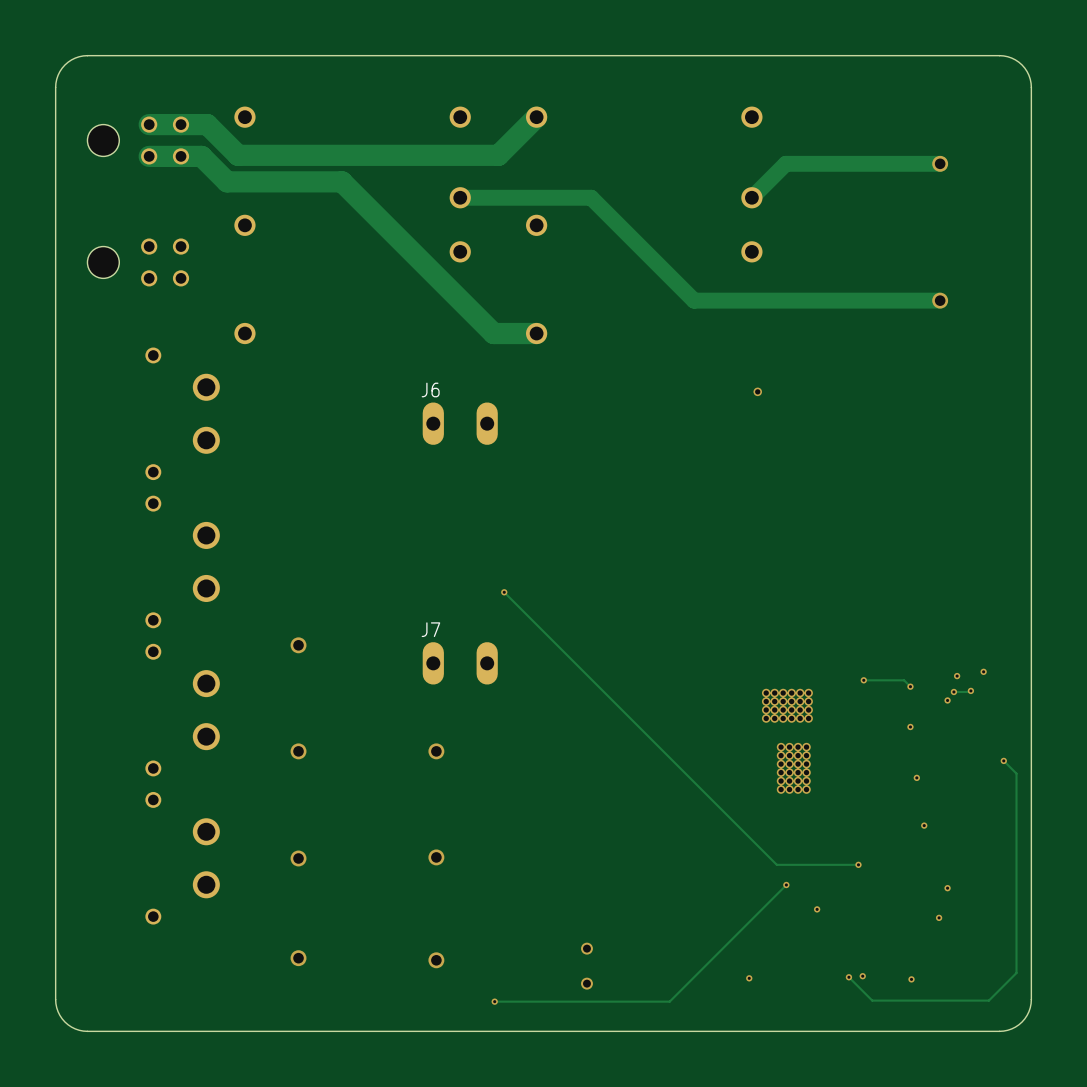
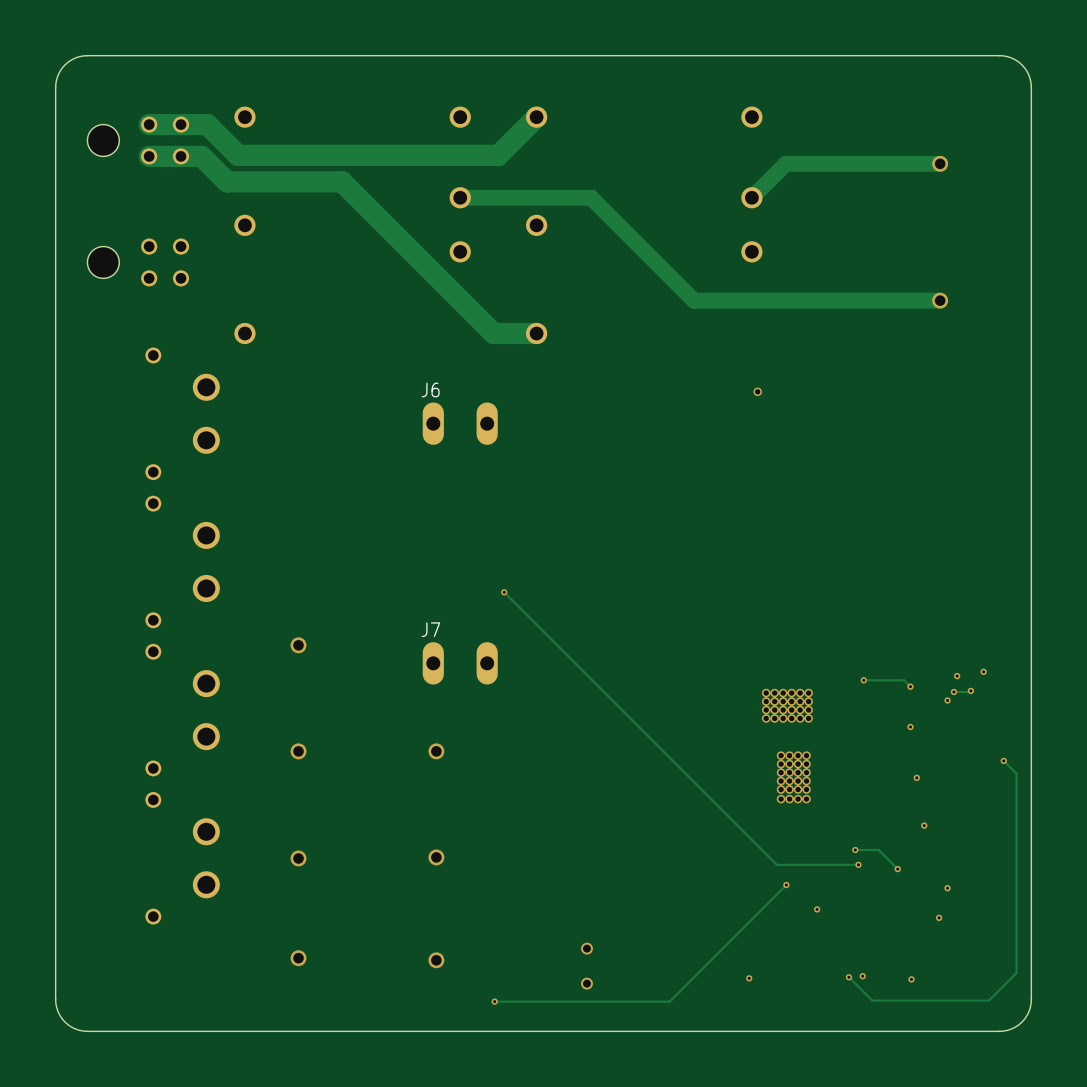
via: (781, 747) -> none
via: (789, 747) -> none
via: (798, 747) -> none
via: (806, 747) -> none
via: none -> (781, 799)
via: none -> (789, 799)
via: none -> (798, 799)
via: none -> (806, 799)
track: none -> (855, 850) (878, 850) (897, 869)
via: none -> (855, 850)
via: none -> (897, 869)

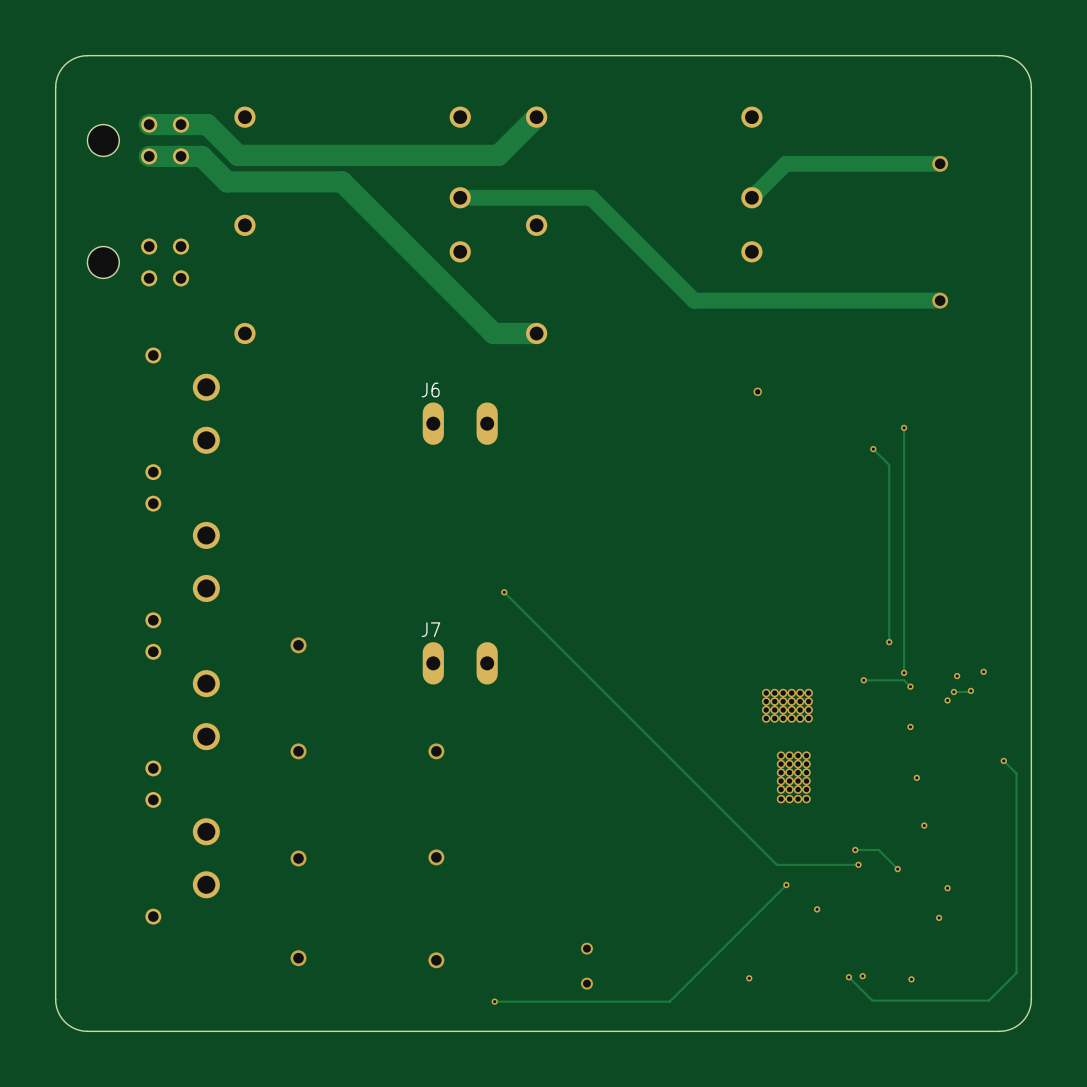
track: none -> (904, 427) (904, 672)
via: none -> (904, 427)
track: none -> (873, 449) (889, 465) (889, 642)
via: none -> (873, 449)
via: none -> (889, 642)
via: none -> (904, 672)

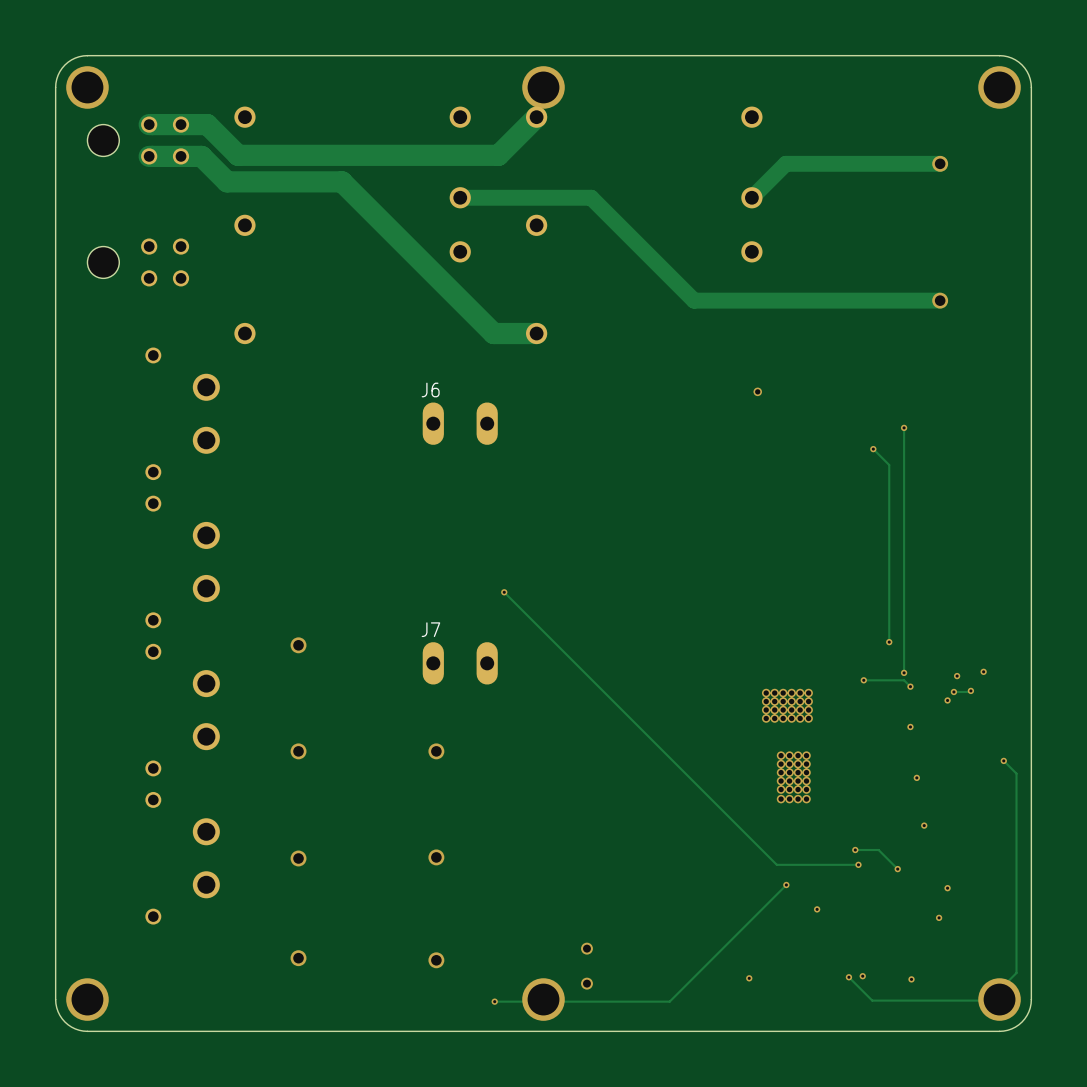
via: none -> (87, 87)
via: none -> (543, 87)
via: none -> (999, 87)
via: none -> (87, 999)
via: none -> (543, 999)
via: none -> (999, 999)

